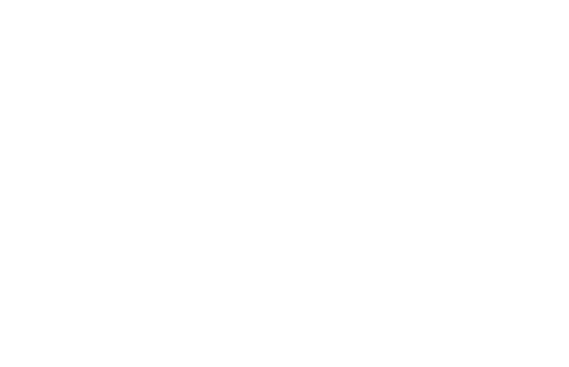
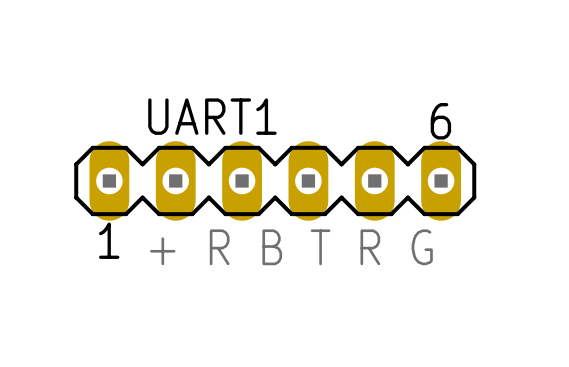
UART1: none -> + R B T R G (275, 180)

